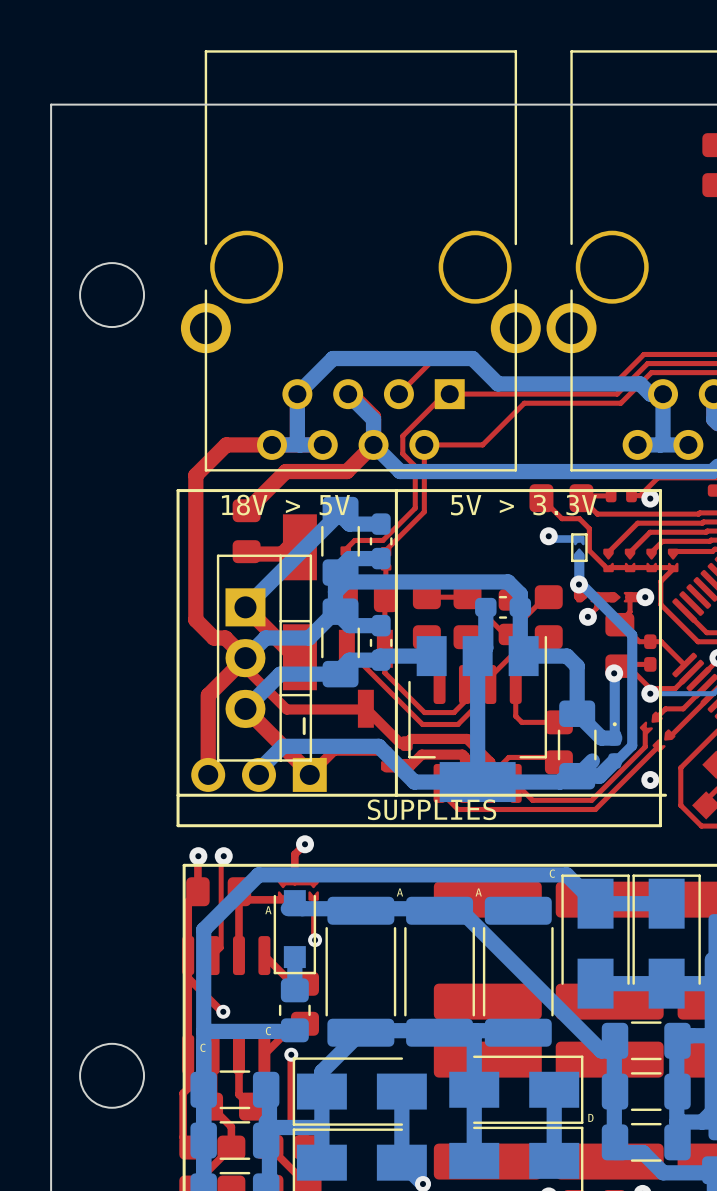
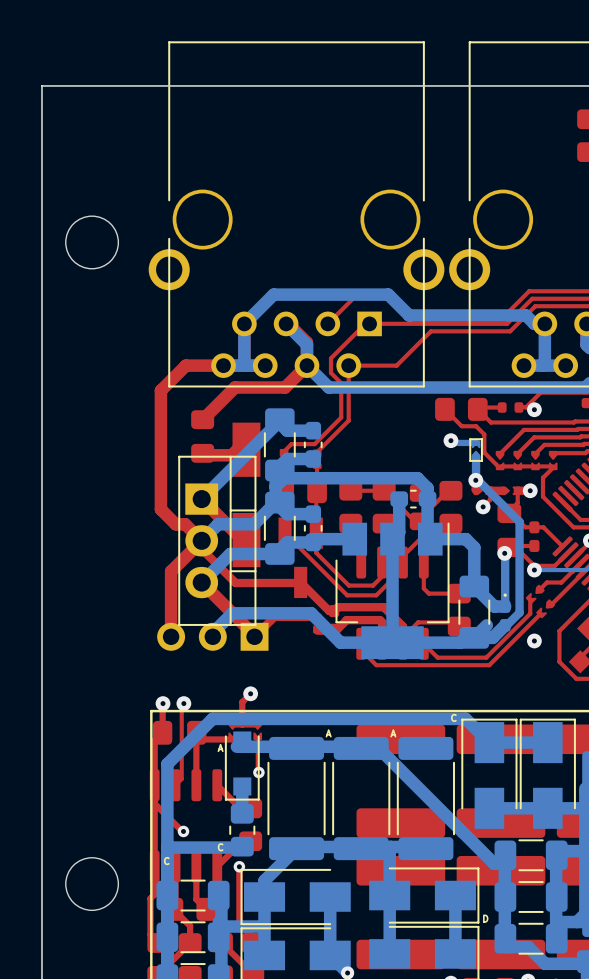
line: (396, 490) (396, 795) -> none
line: (660, 490) (660, 825) (178, 825) (178, 490) (660, 490) -> none
text: 18V > 5V (285, 505) -> none
text: 5V > 3.3V (523, 505) -> none
line: (304, 718) (304, 733) -> none
line: (665, 795) (178, 795) -> none
text: SUPPLIES (431, 809) -> none

